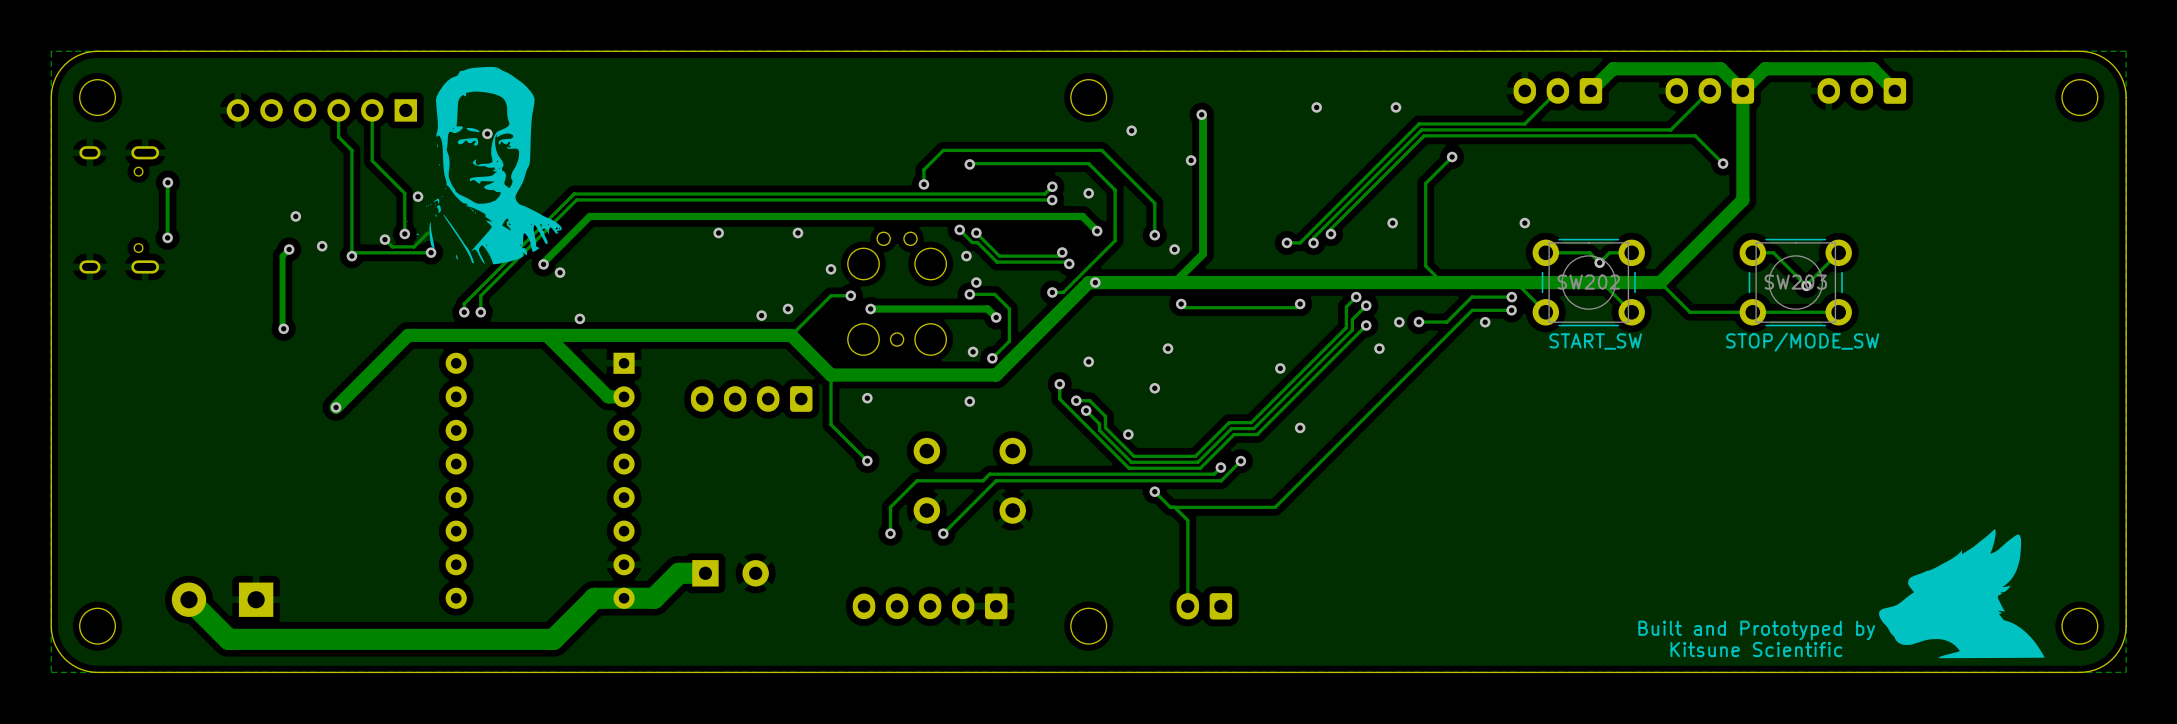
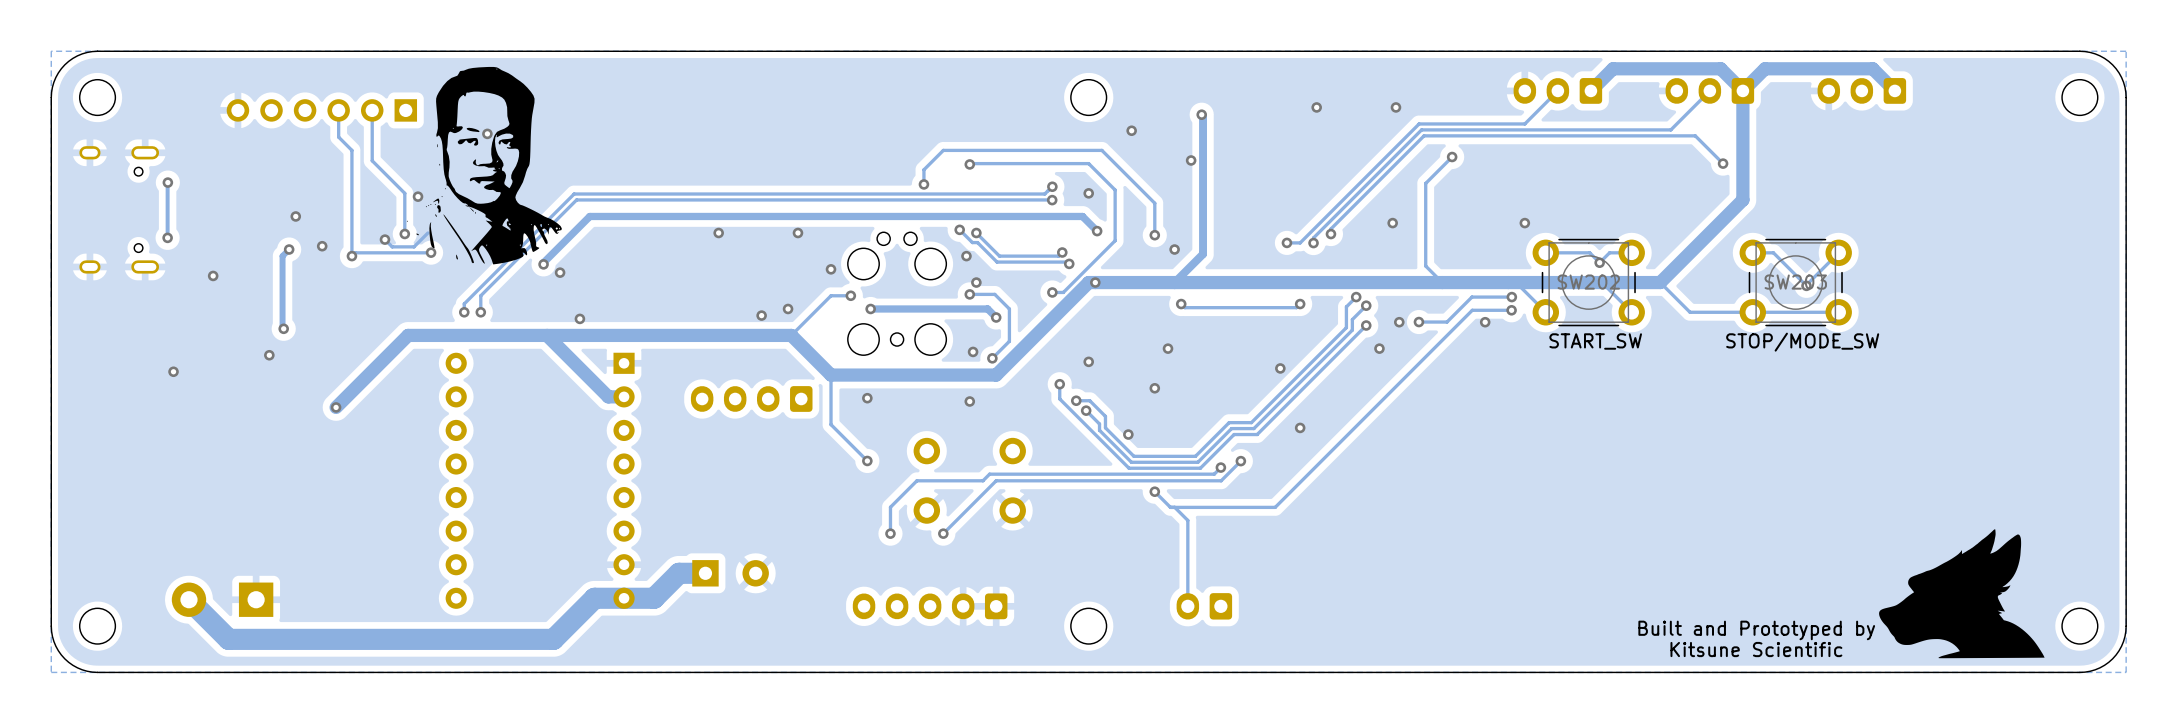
via: none -> (213, 275)
via: none -> (269, 355)
via: none -> (173, 371)

